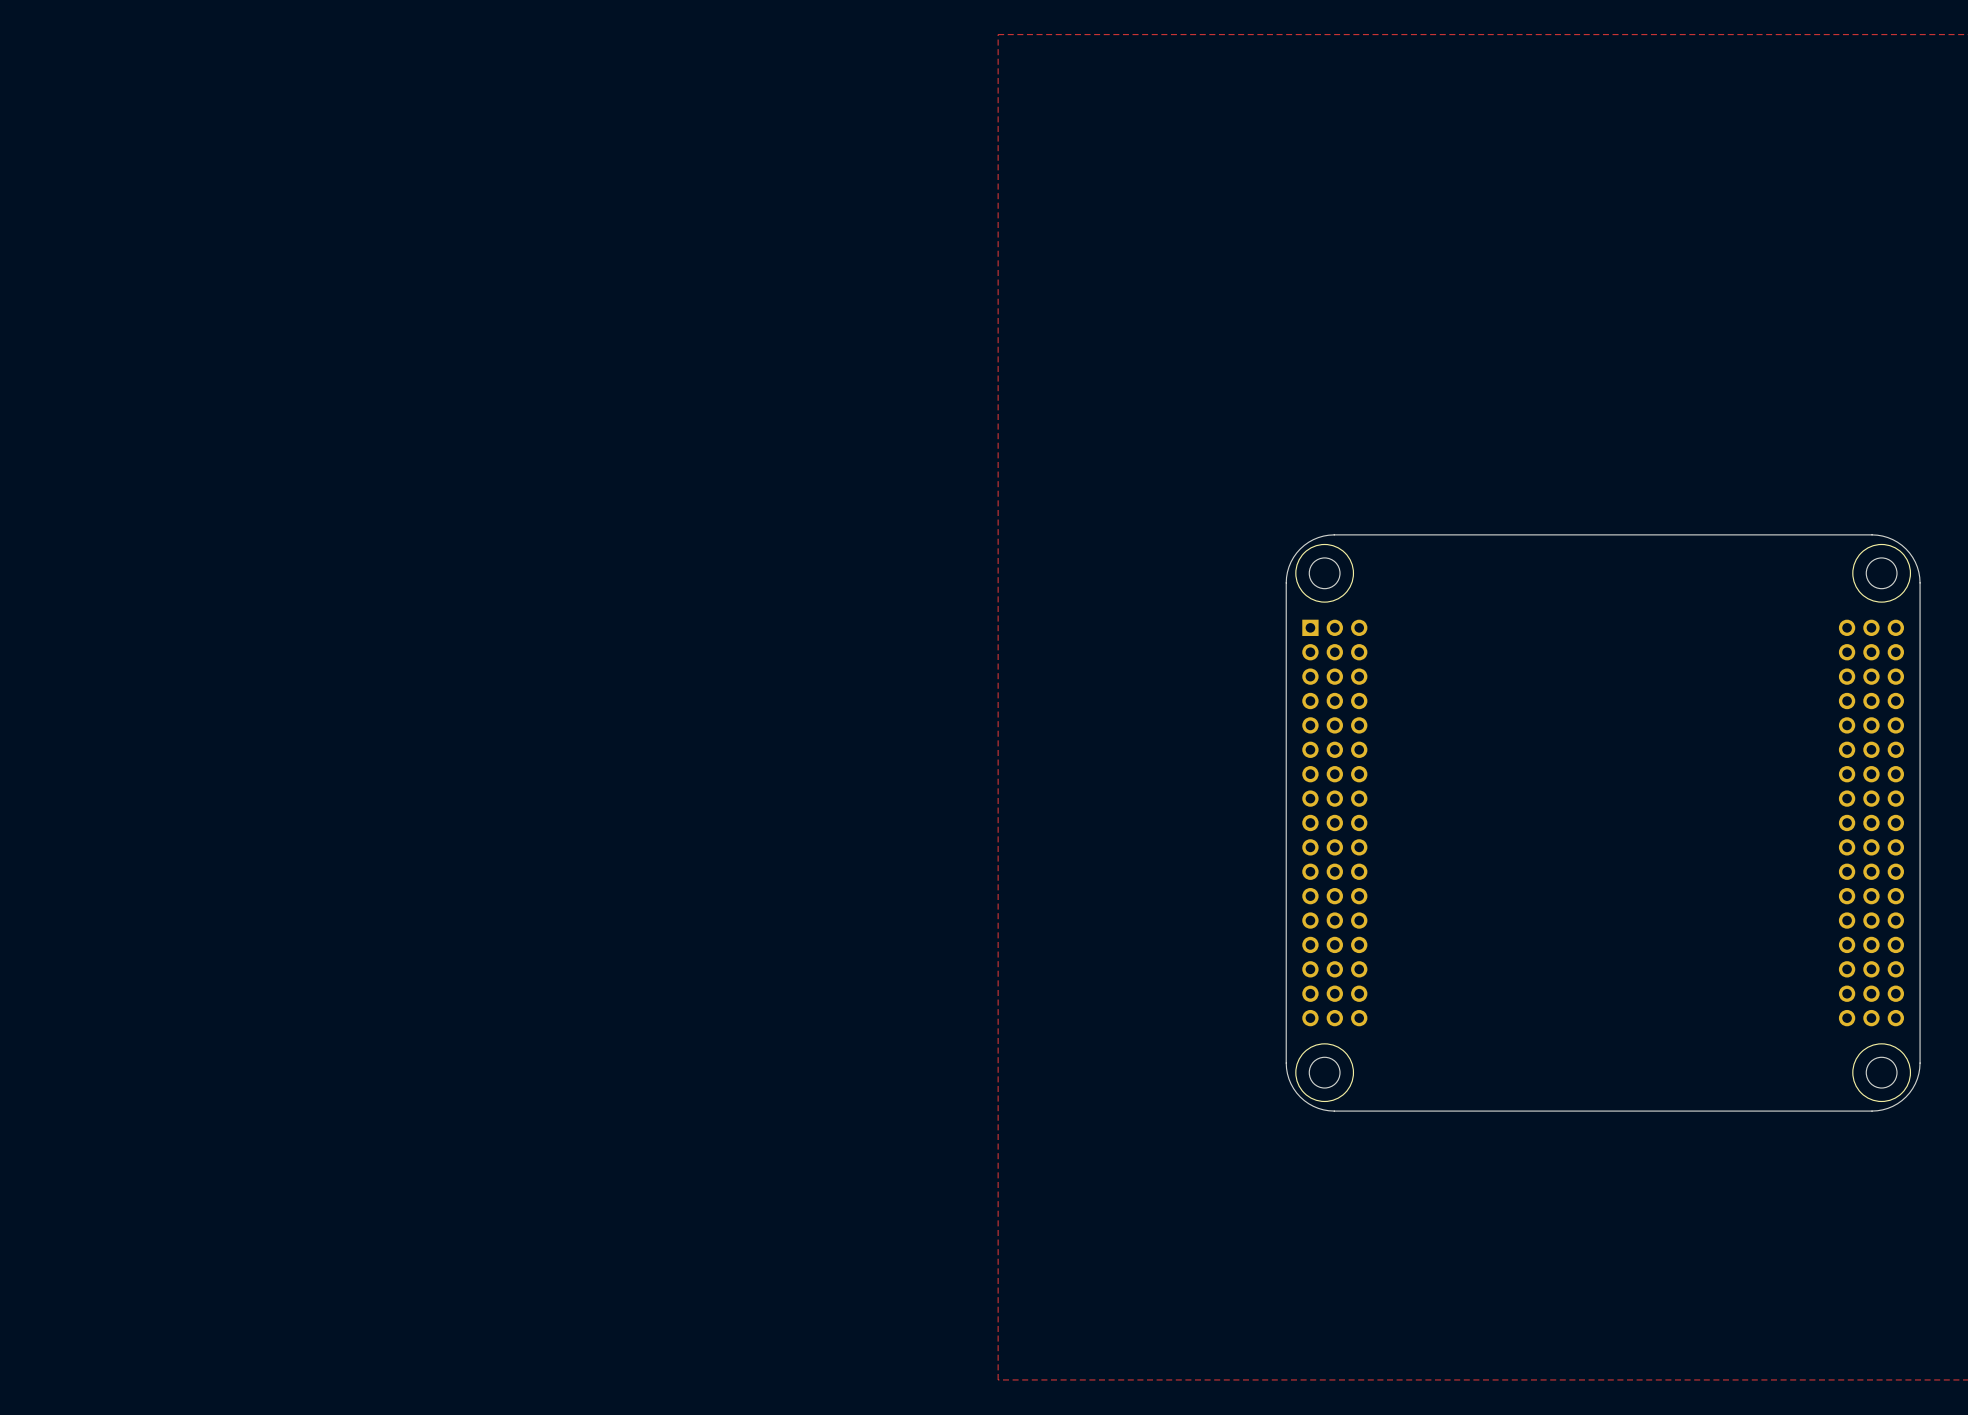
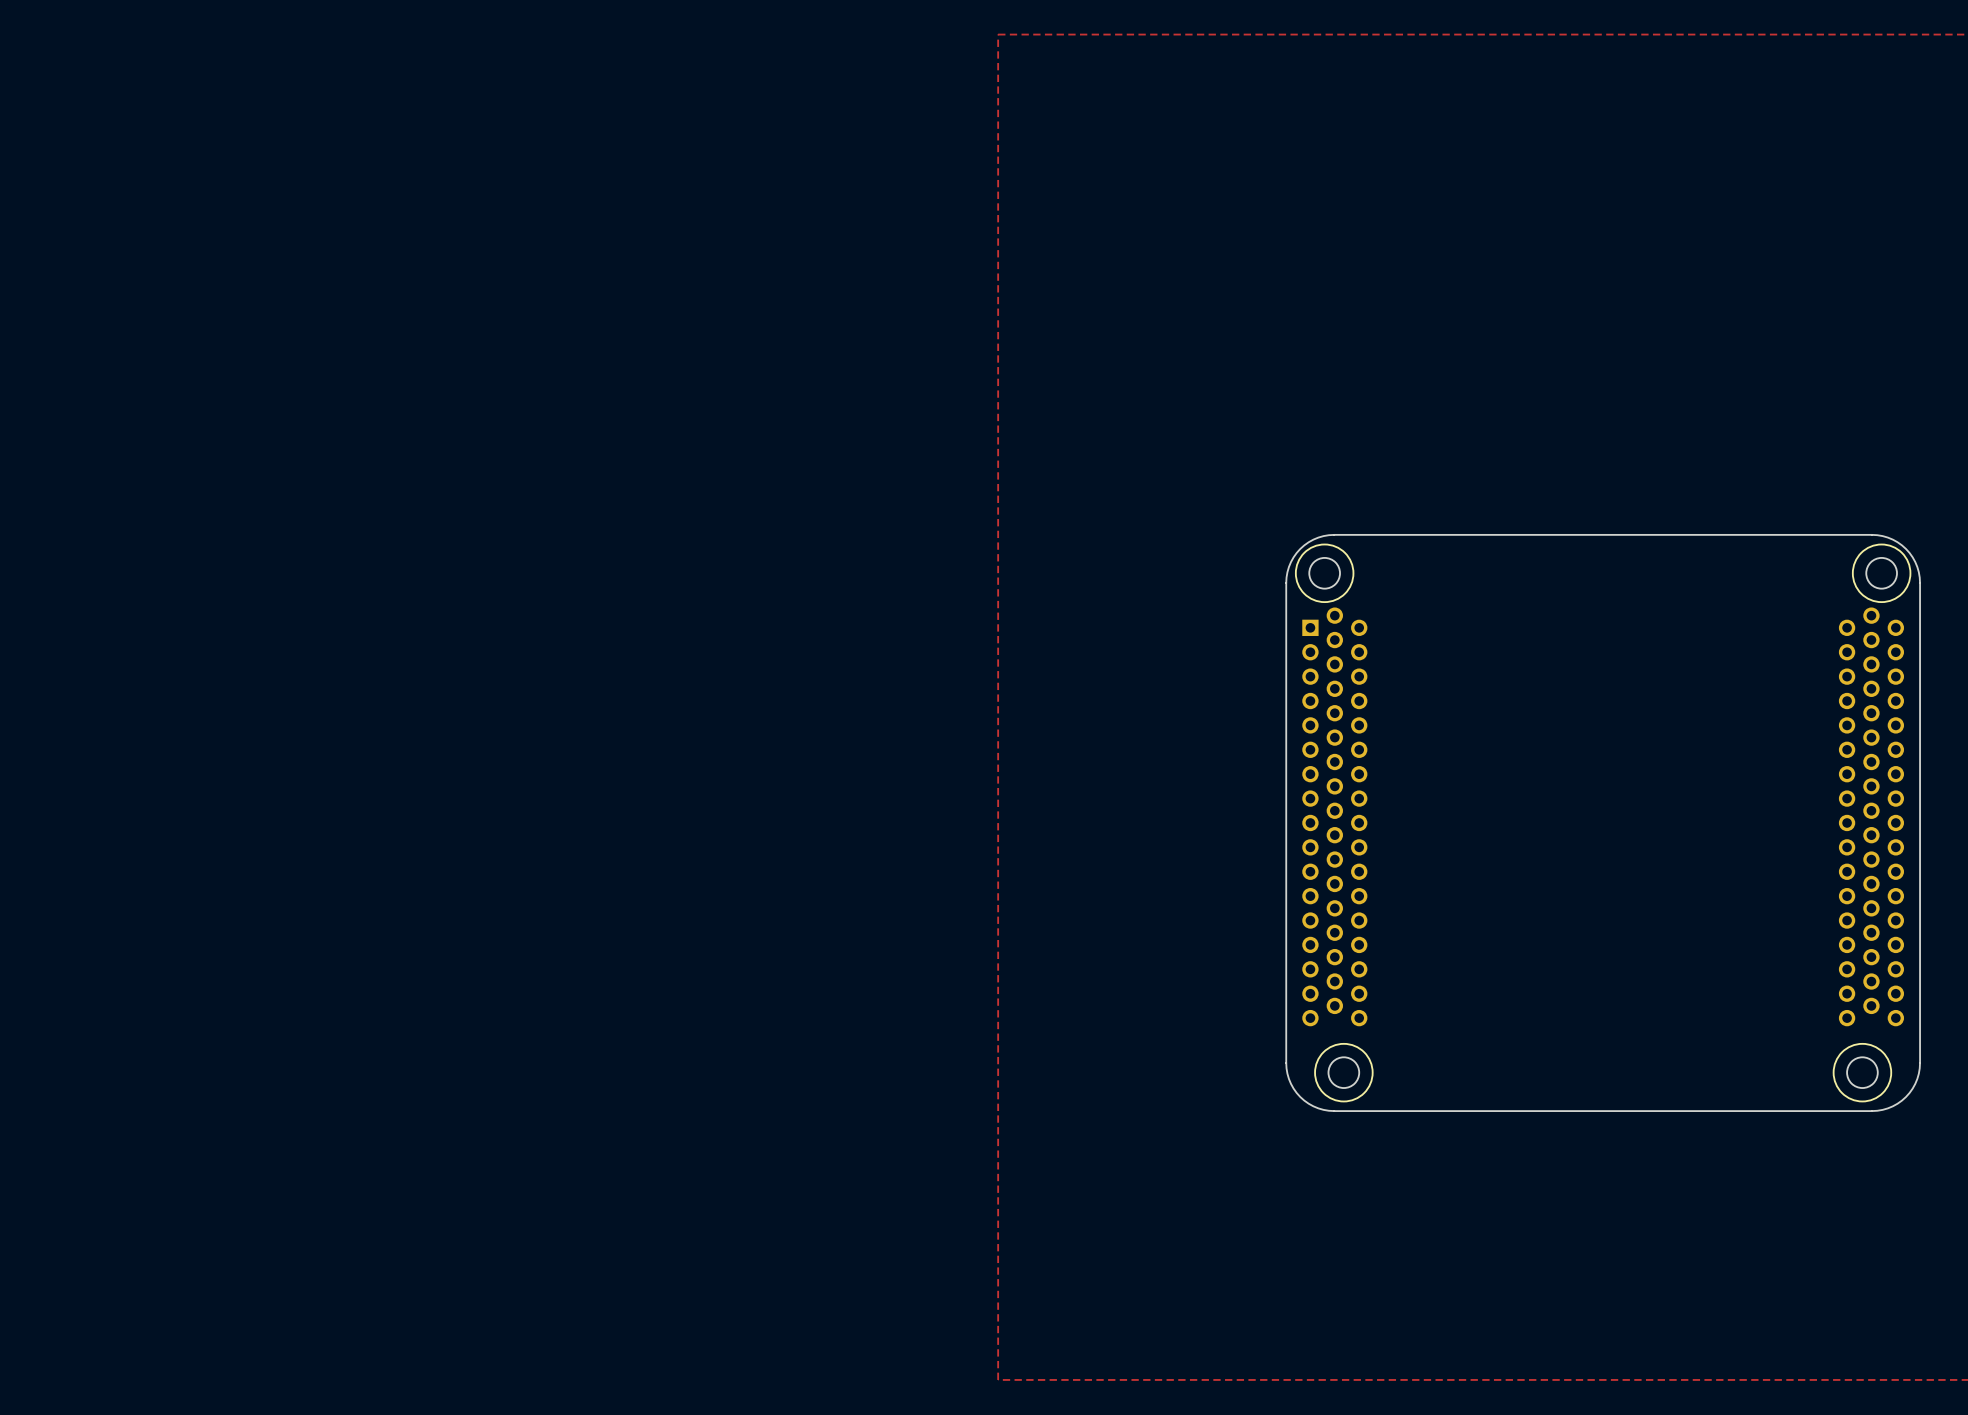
part footprint: [1285, 534, 1921, 1112] -> [1285, 534, 1921, 1112]

